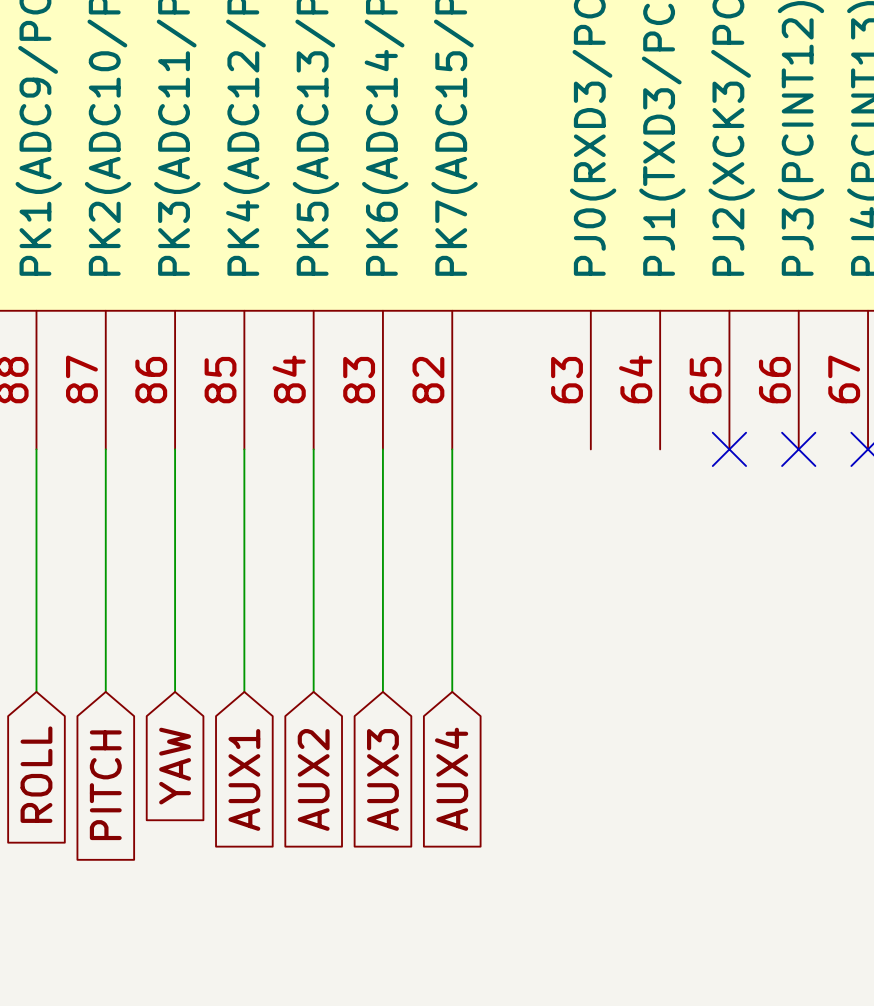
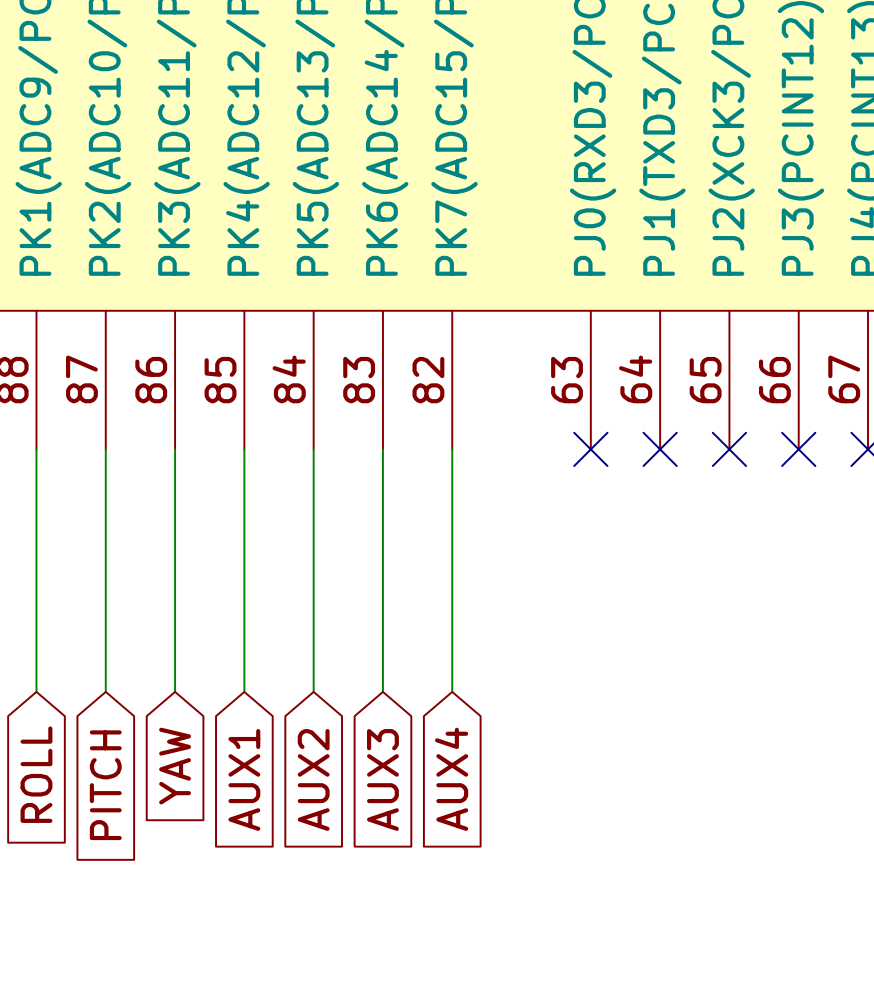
no-connect mark: none -> (590, 449)
no-connect mark: none -> (660, 449)

